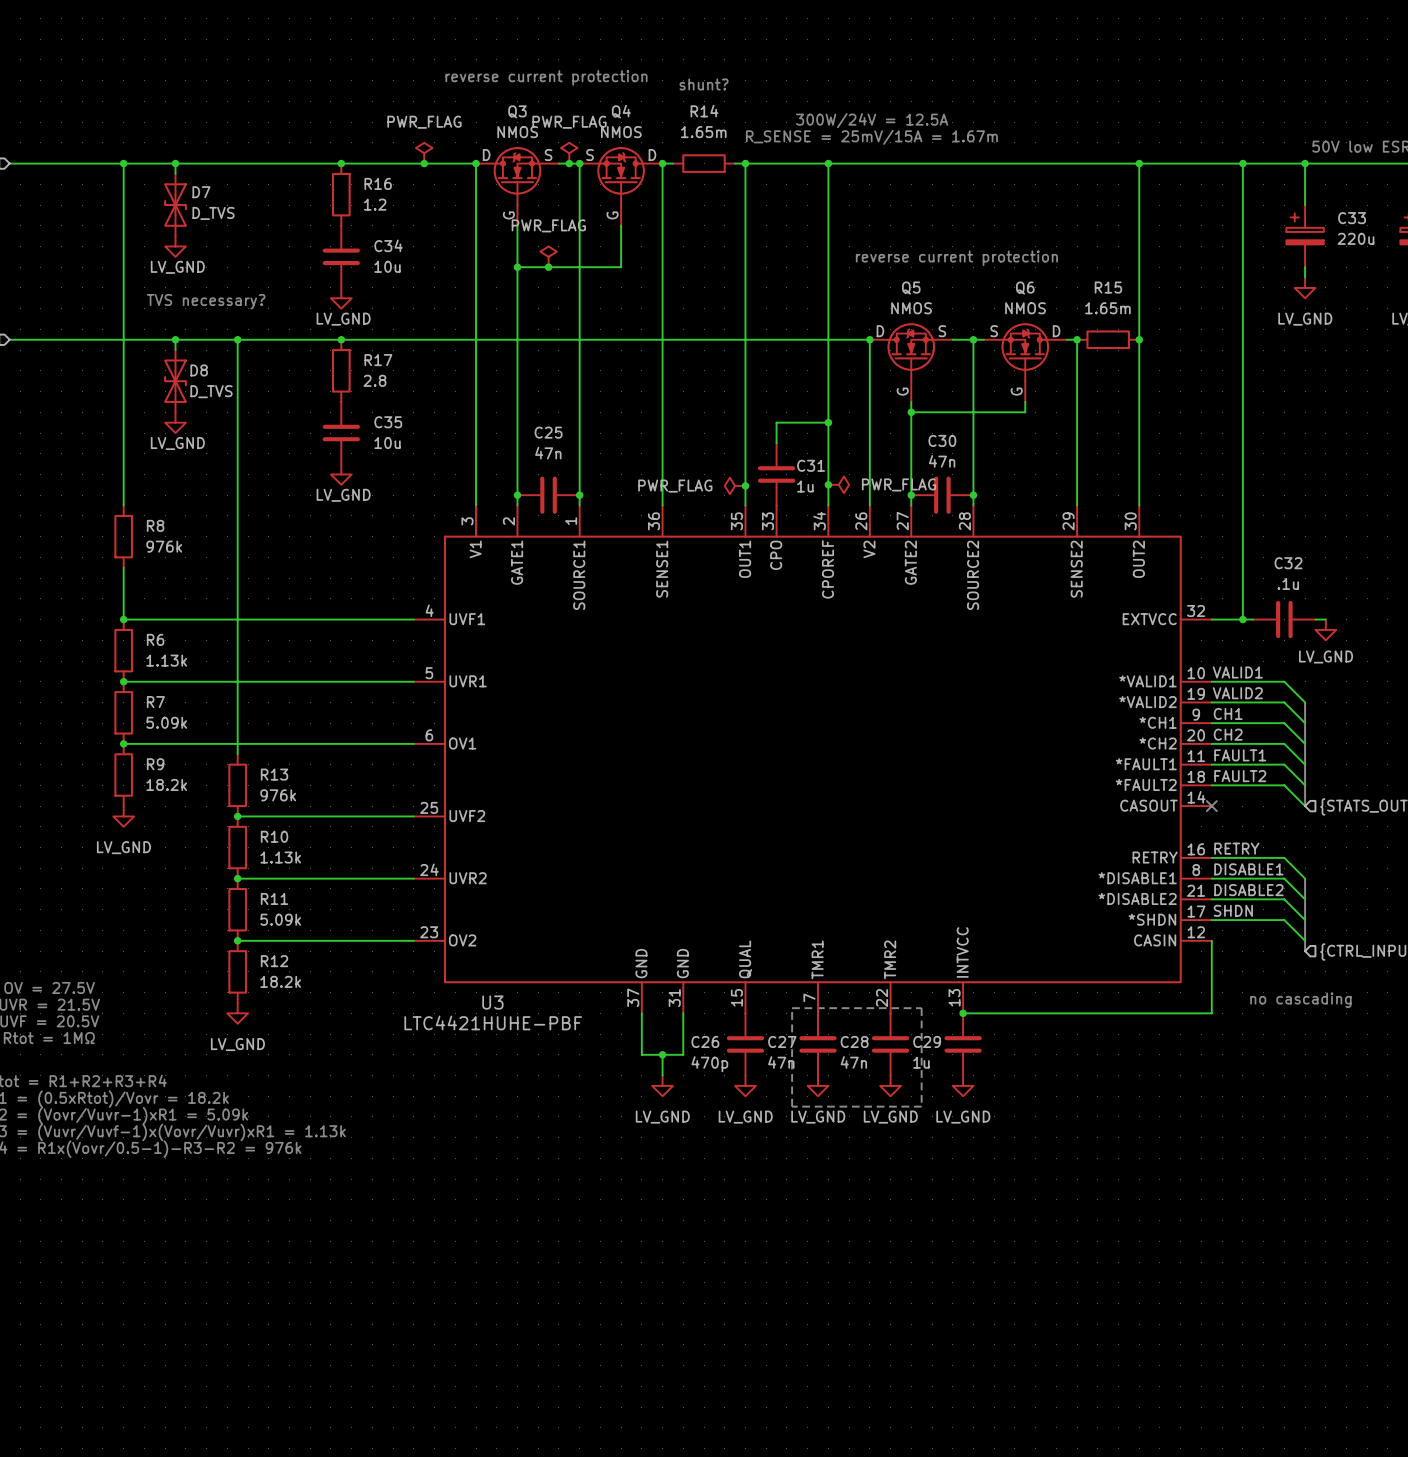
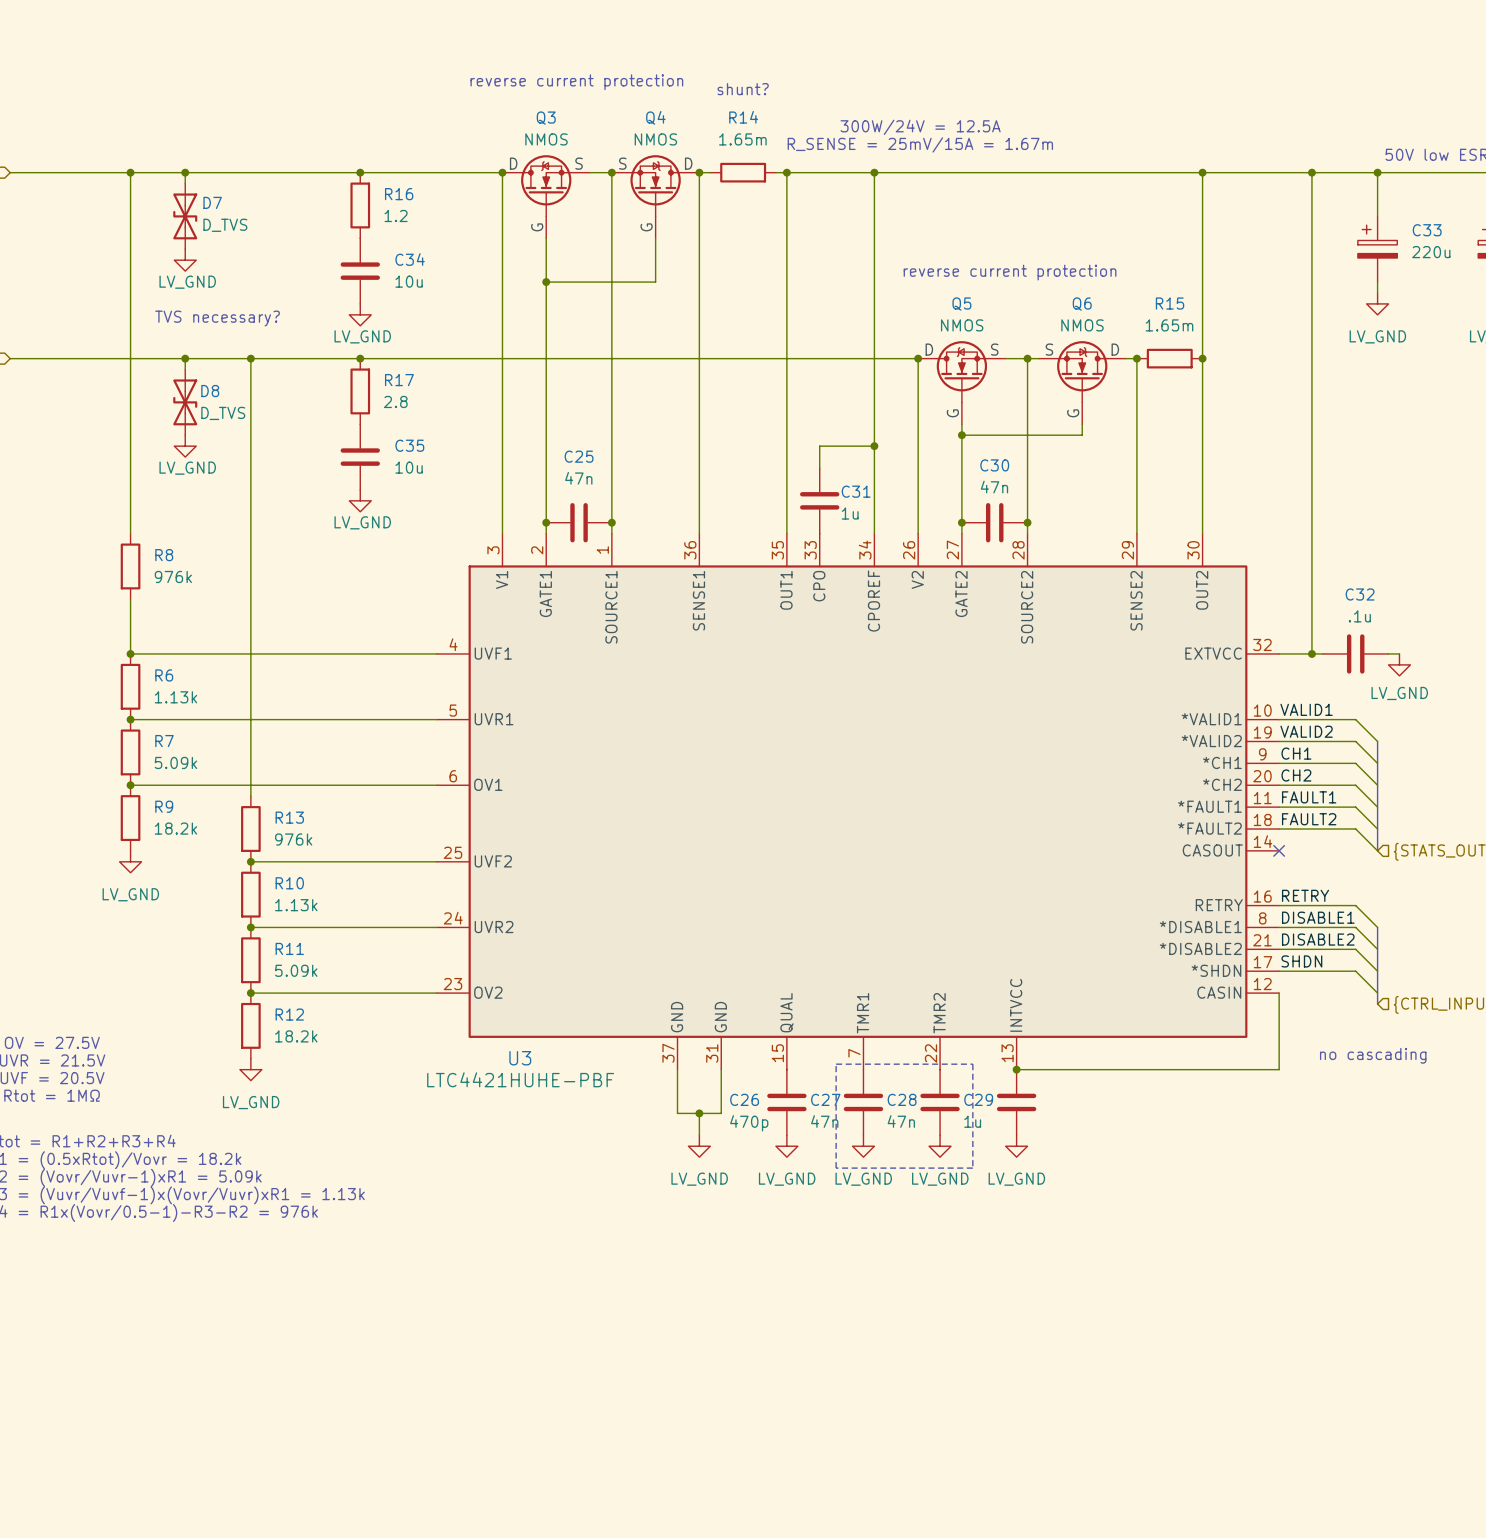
power symbol: PWR_FLAG (424, 153) -> none
power symbol: PWR_FLAG (569, 153) -> none
junction: (424, 163) -> none
junction: (569, 163) -> none
power symbol: PWR_FLAG (548, 256) -> none
junction: (548, 267) -> none
junction: (828, 484) -> none
power symbol: PWR_FLAG (838, 484) -> none
power symbol: PWR_FLAG (735, 485) -> none
junction: (745, 485) -> none

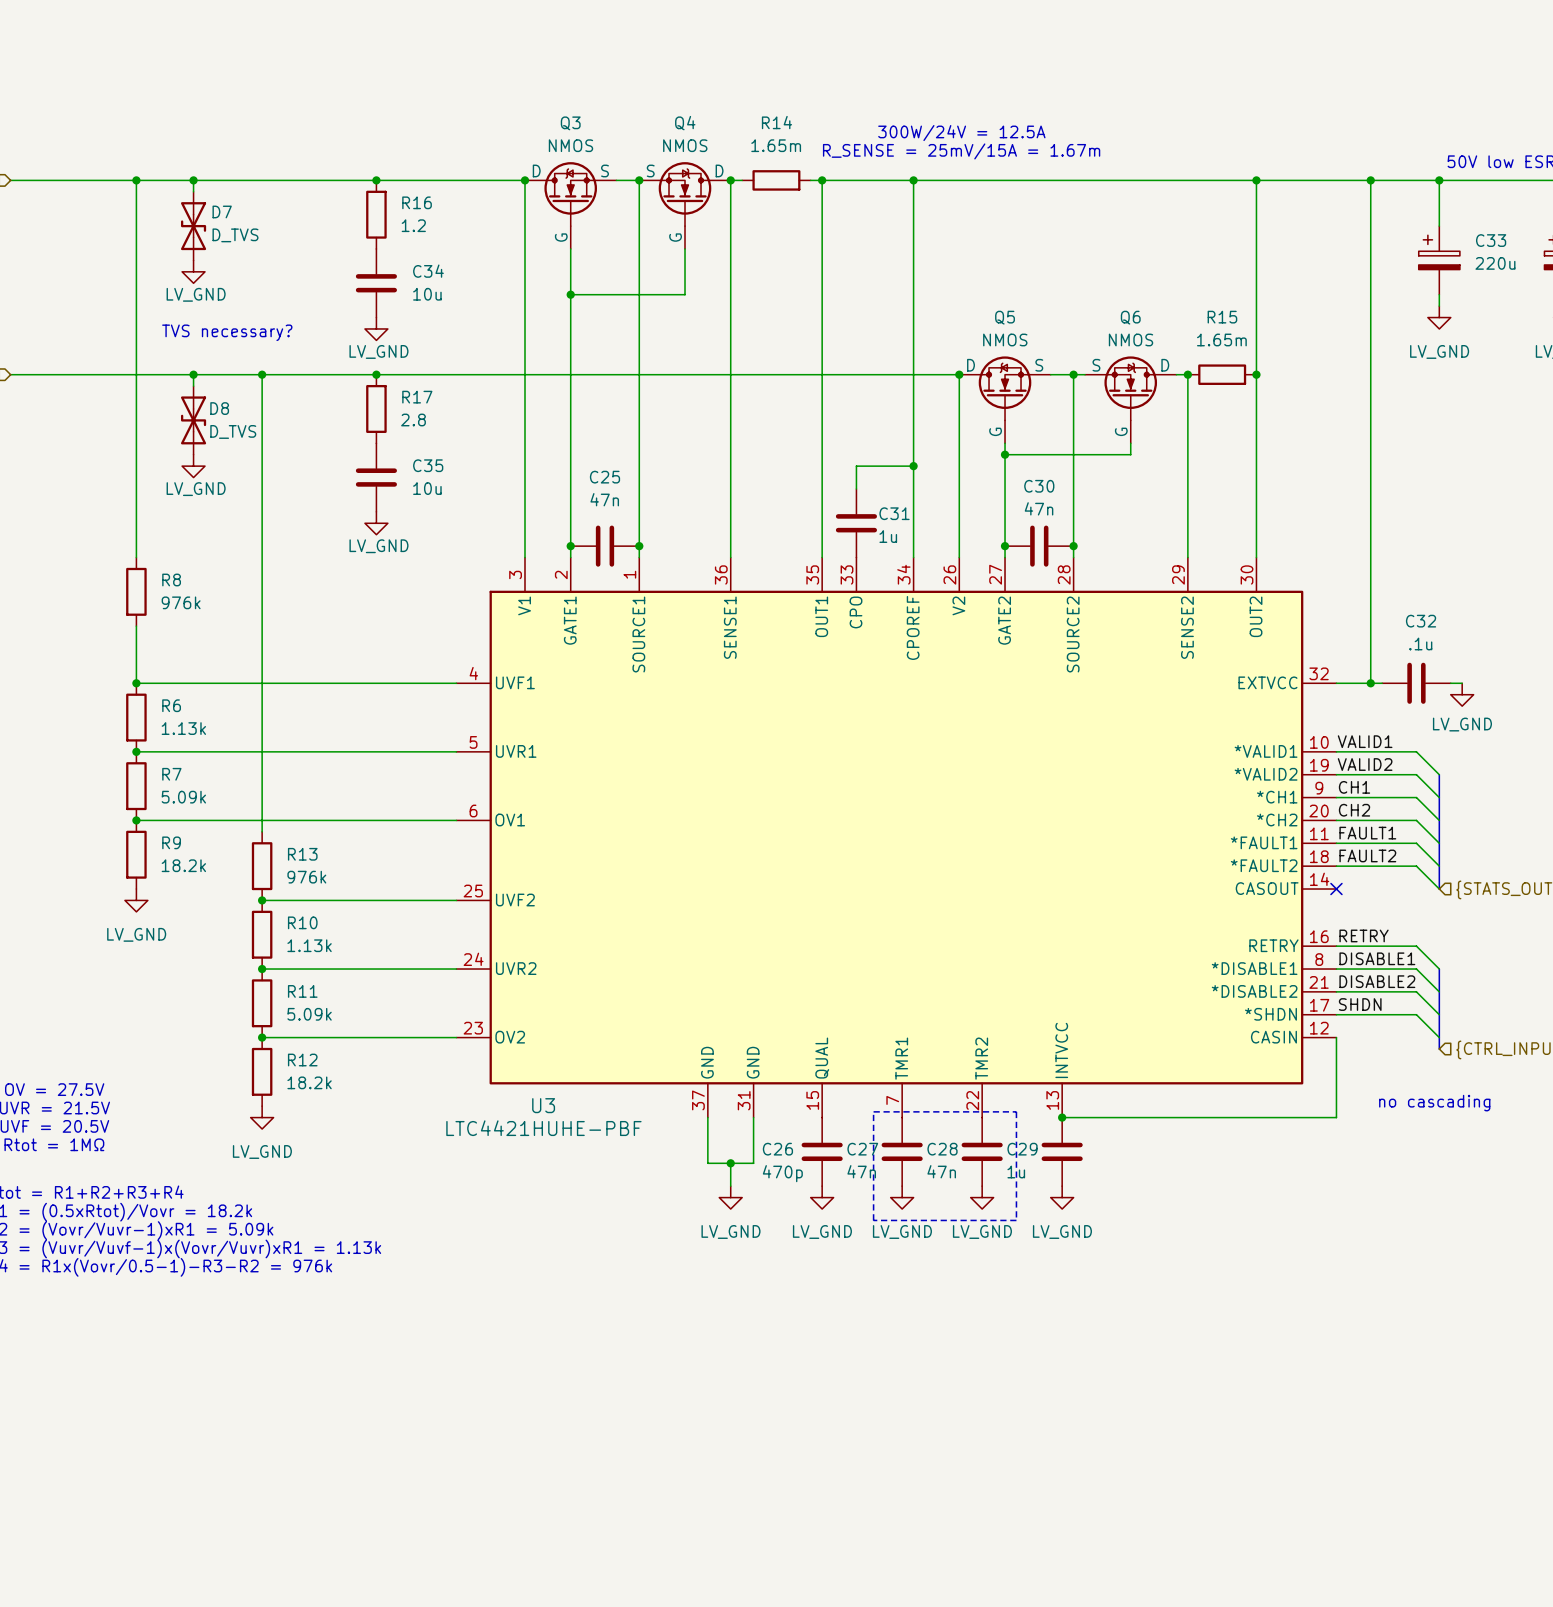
text: reverse current protection (576, 82) -> none
text: shunt? (743, 89) -> none
text: reverse current protection (1010, 272) -> none

